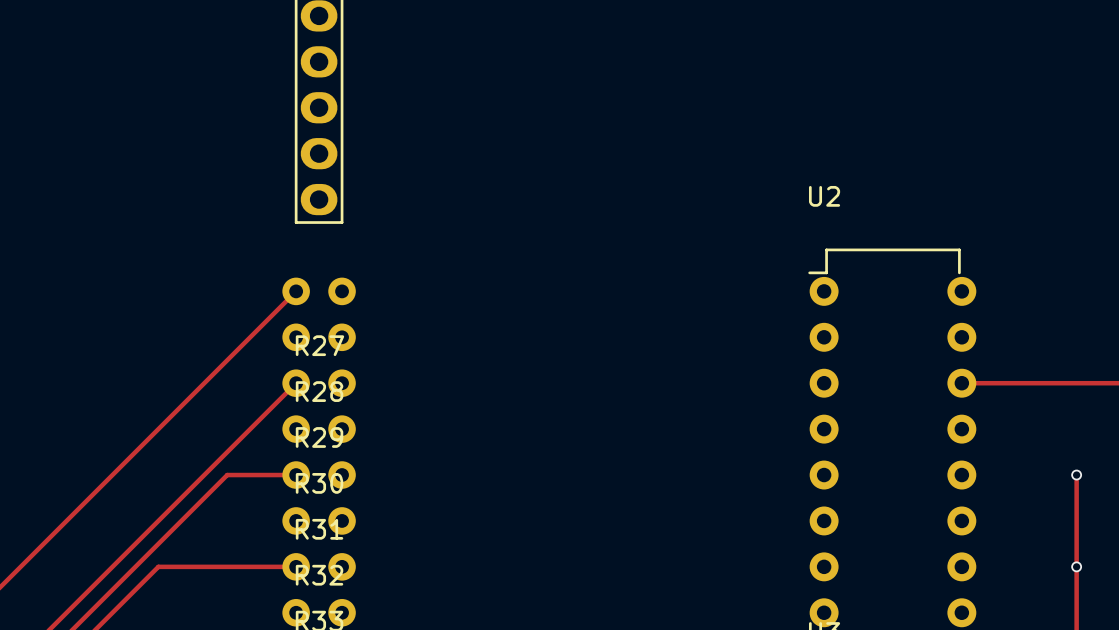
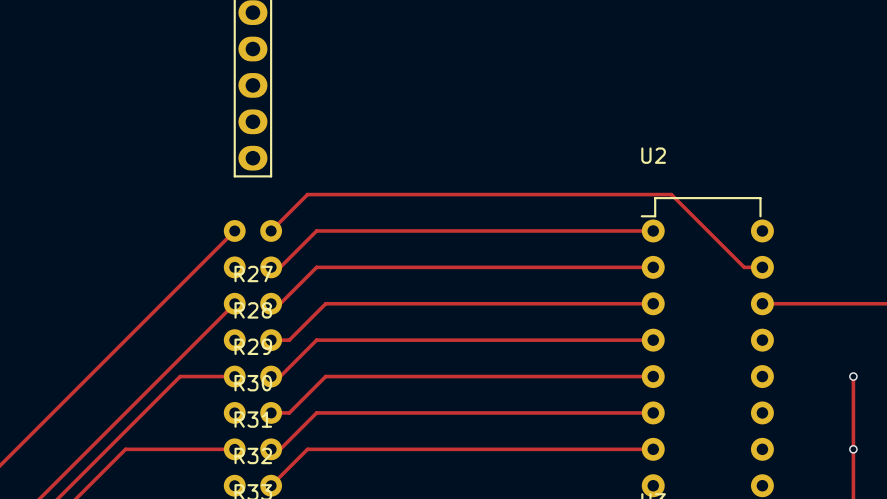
track: none -> (271, 230) (307, 194) (671, 194) (744, 267) (762, 267)
track: none -> (653, 230) (316, 230) (280, 267) (271, 267)
track: none -> (653, 267) (316, 267) (280, 303) (271, 303)
track: none -> (653, 303) (325, 303) (289, 340) (271, 340)
track: none -> (653, 340) (316, 340) (280, 376) (271, 376)
track: none -> (653, 376) (325, 376) (289, 412) (271, 412)
track: none -> (653, 412) (316, 412) (280, 449) (271, 449)
track: none -> (653, 449) (307, 449) (271, 485)

